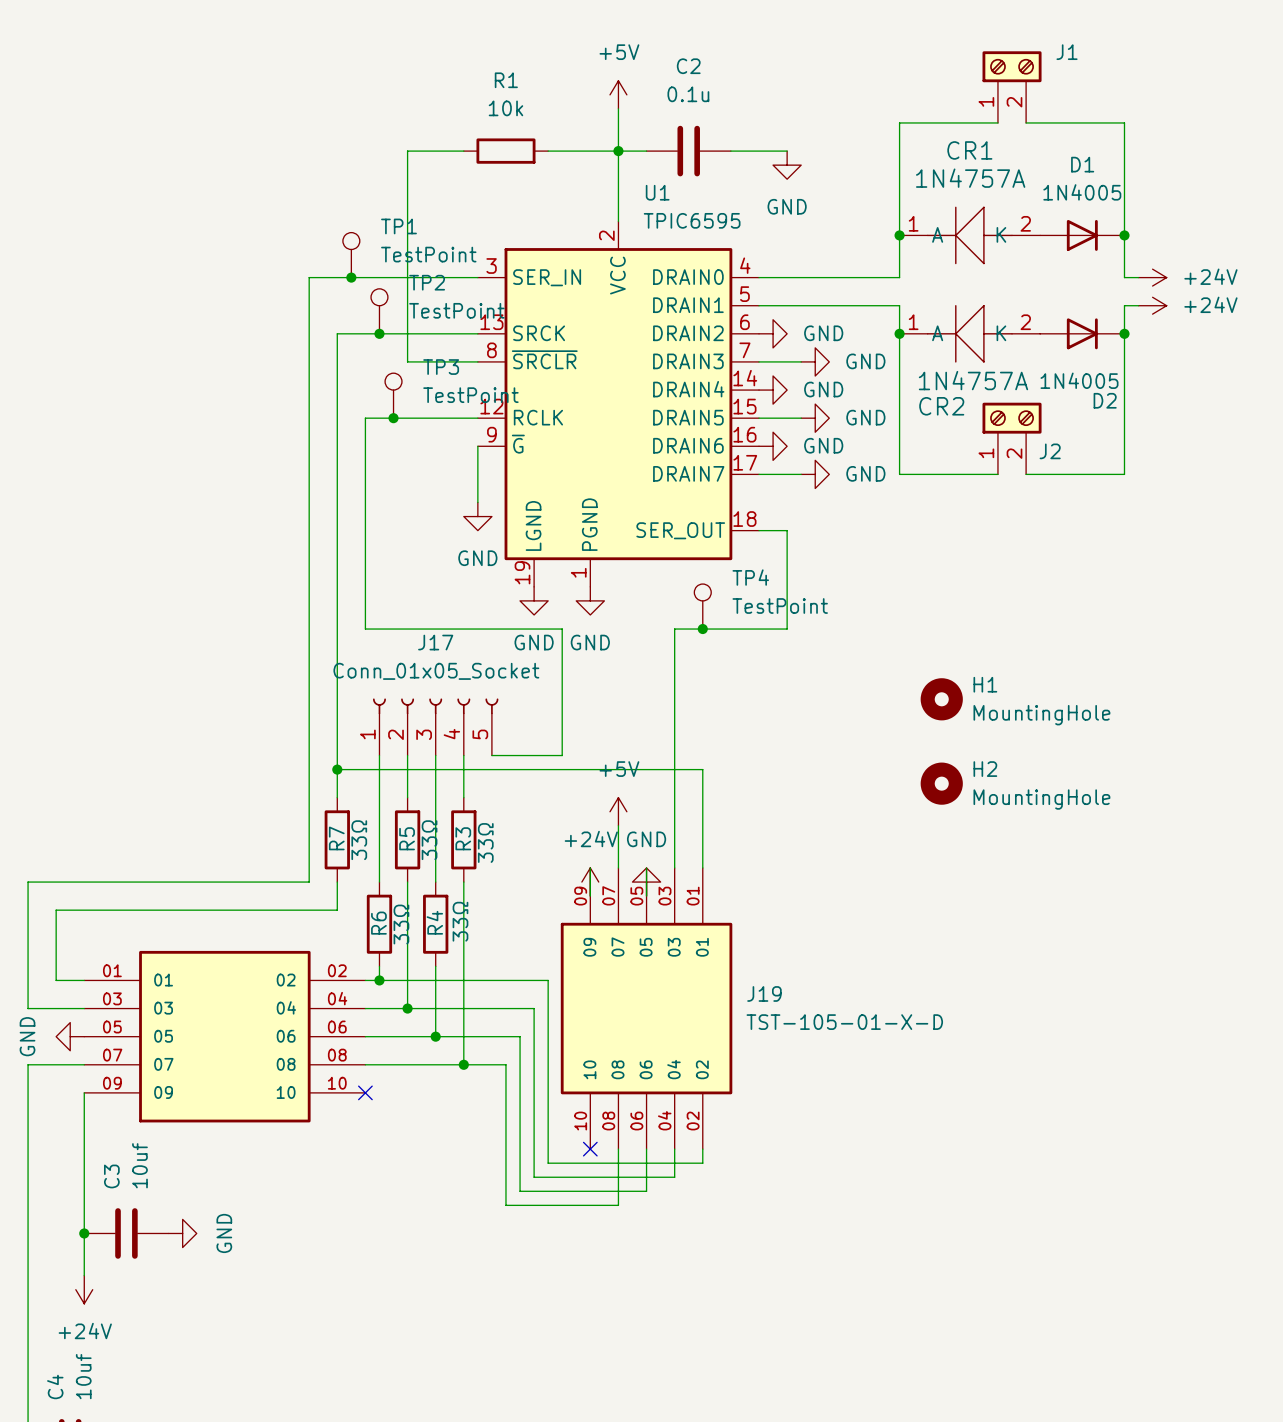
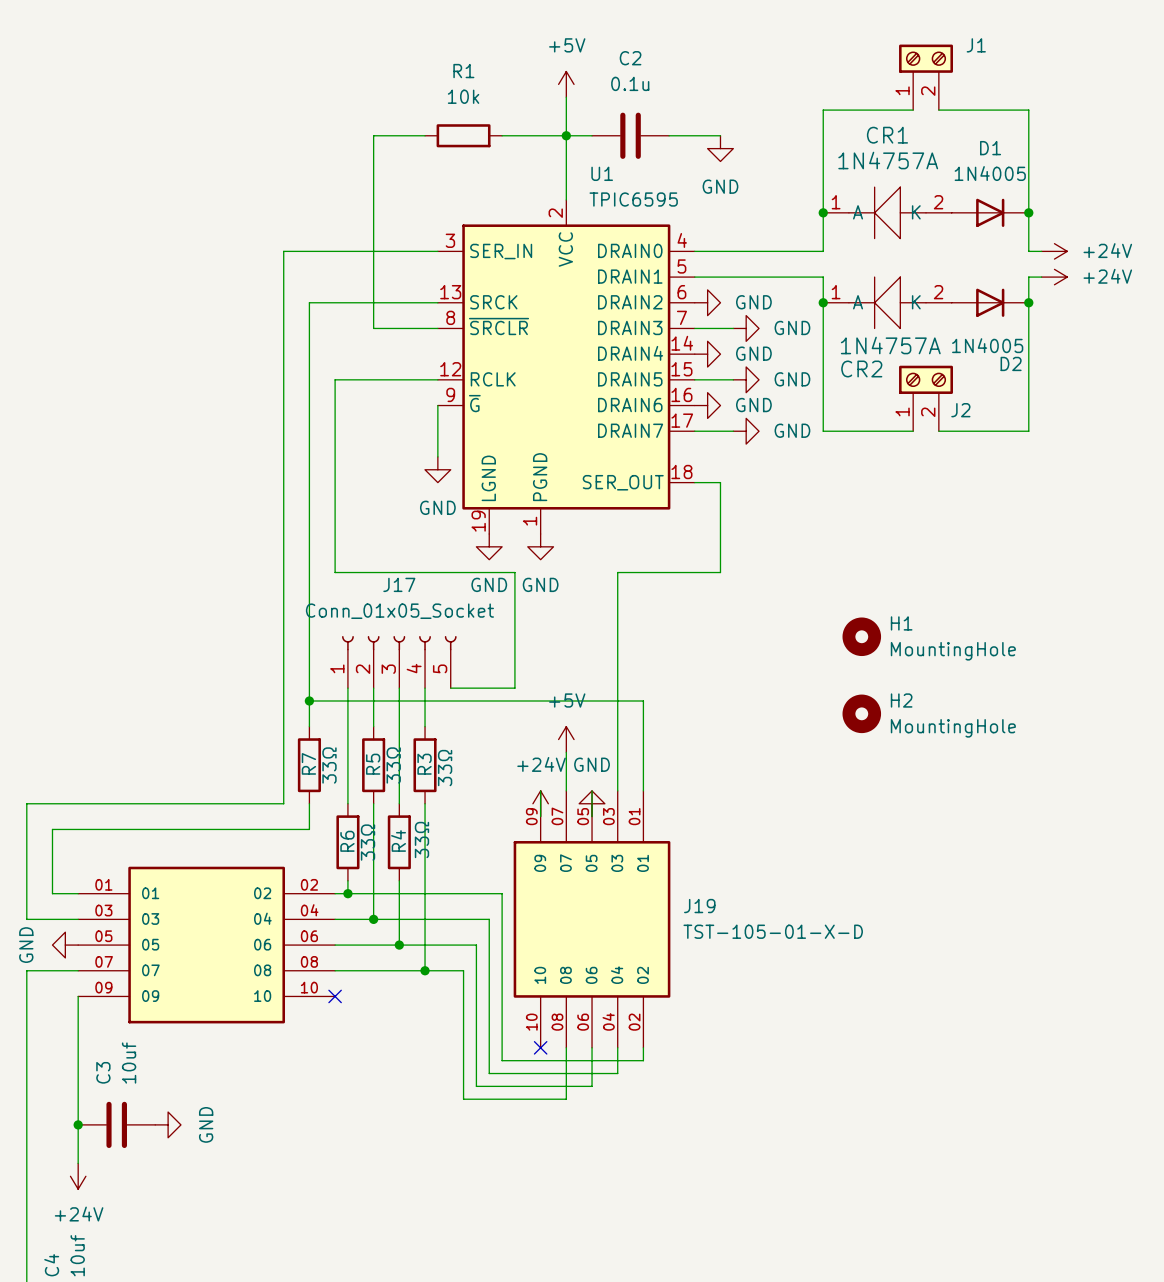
TP1: TestPoint (351, 255) -> none
junction: (351, 277) -> none
TP2: TestPoint (379, 311) -> none
junction: (379, 333) -> none
TP3: TestPoint (393, 395) -> none
junction: (393, 418) -> none
TP4: TestPoint (702, 606) -> none
junction: (702, 629) -> none

